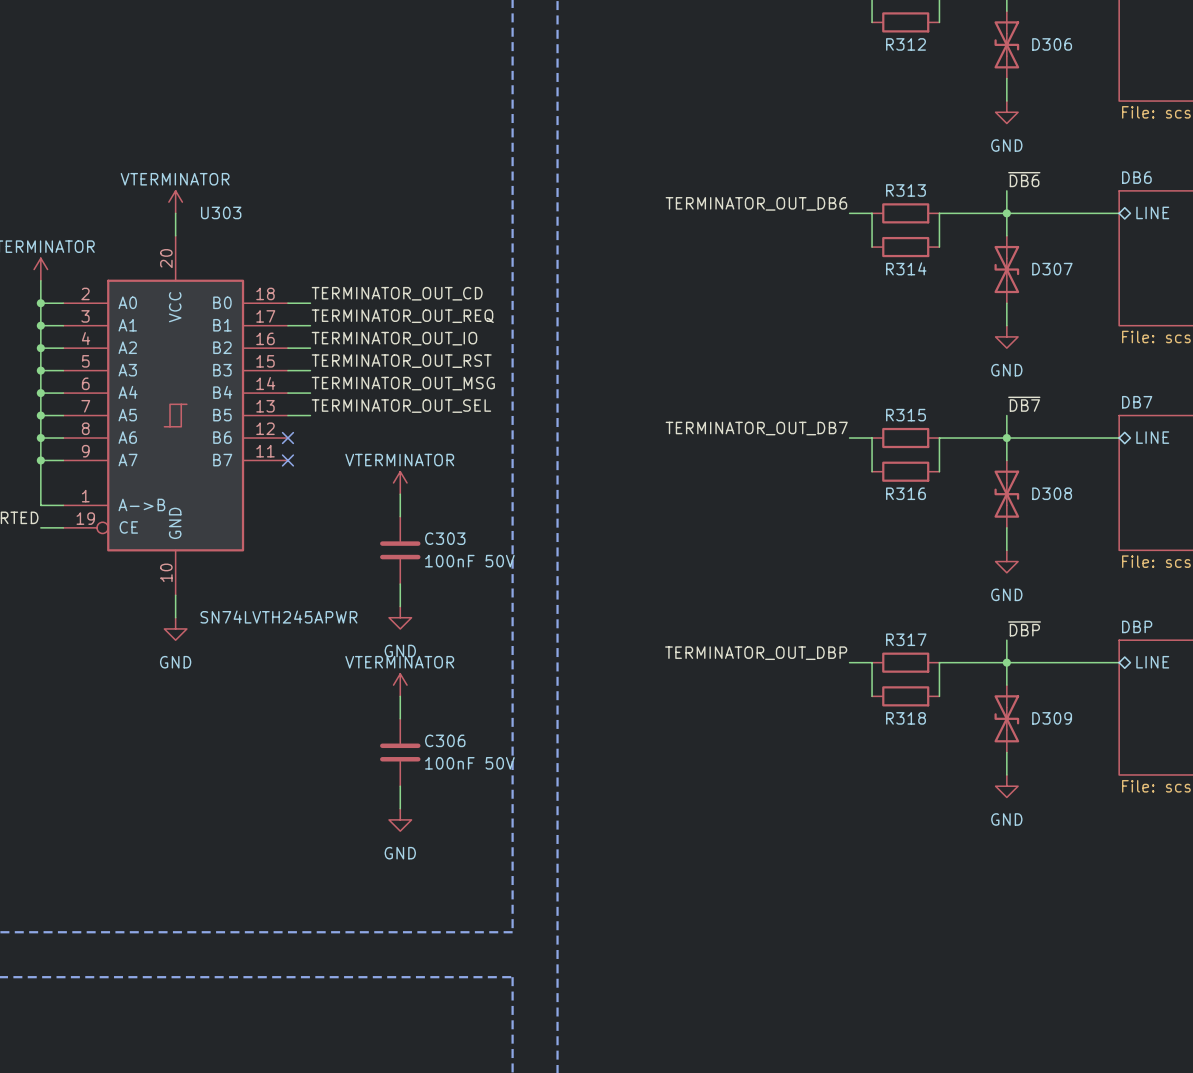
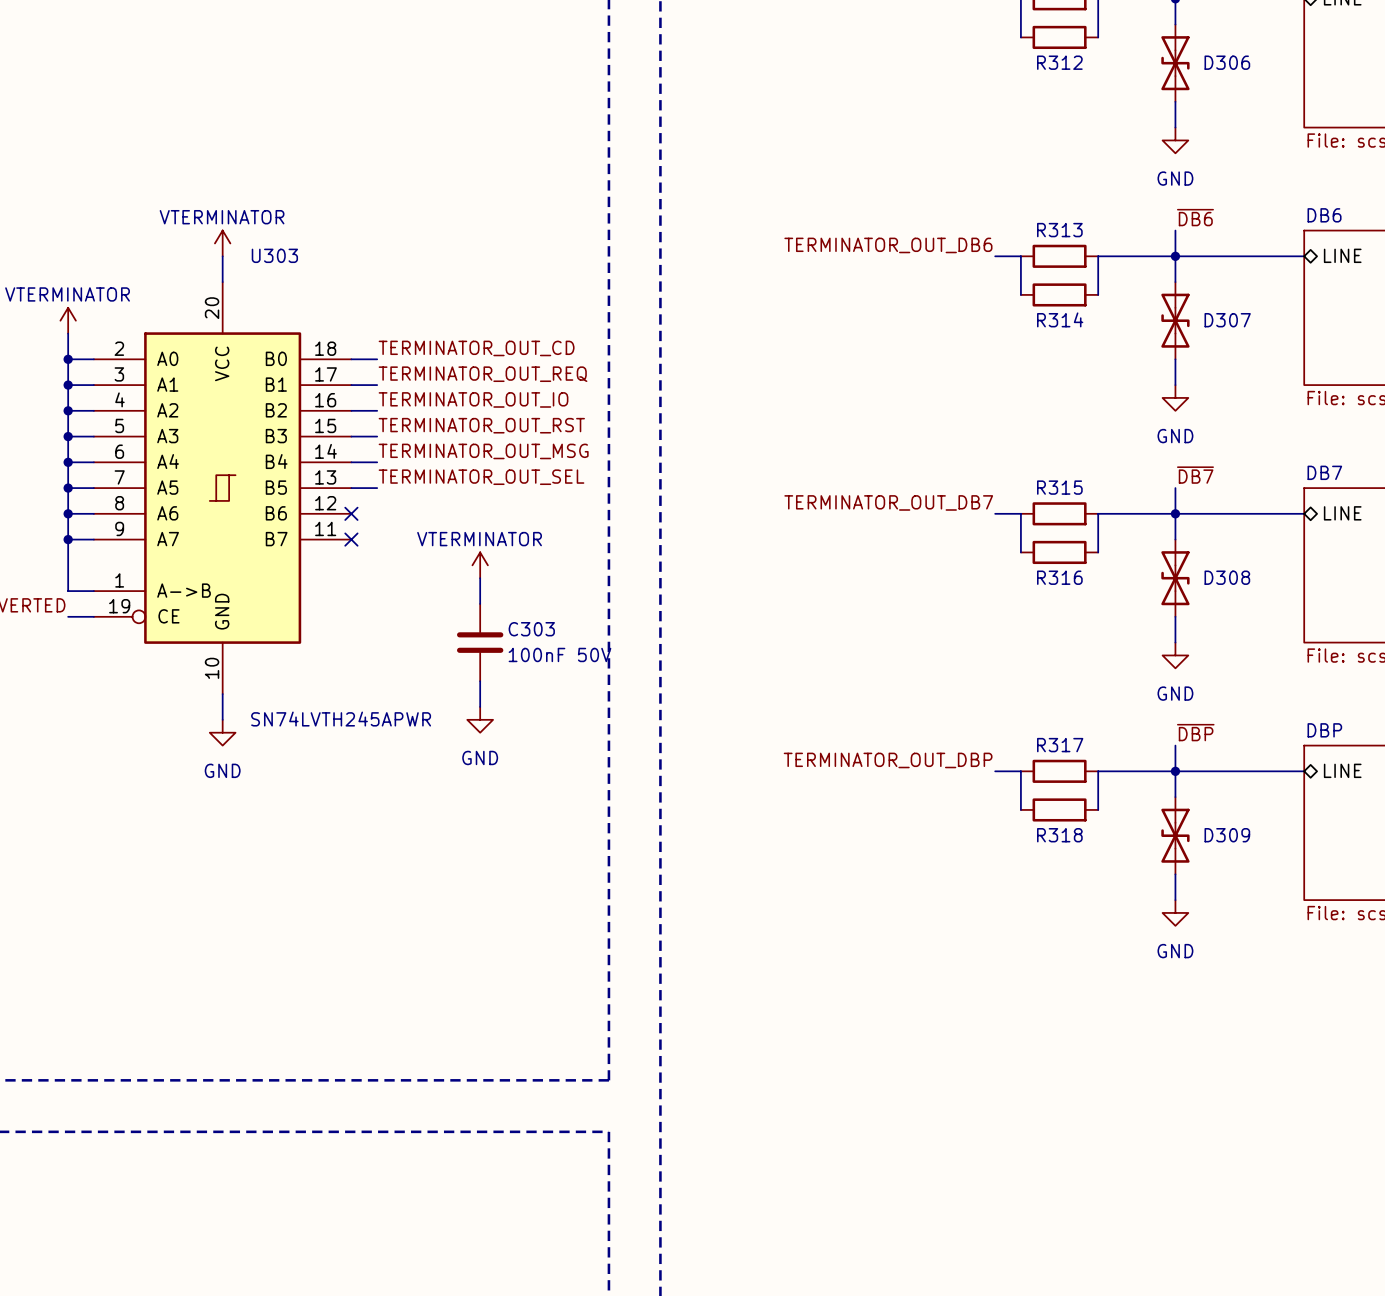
power symbol: VTERMINATOR (400, 685) -> none
wire: (400, 696) (400, 718) -> none
C306: 100nF 50V (400, 752) -> none
wire: (400, 786) (400, 808) -> none
power symbol: GND (400, 819) -> none

